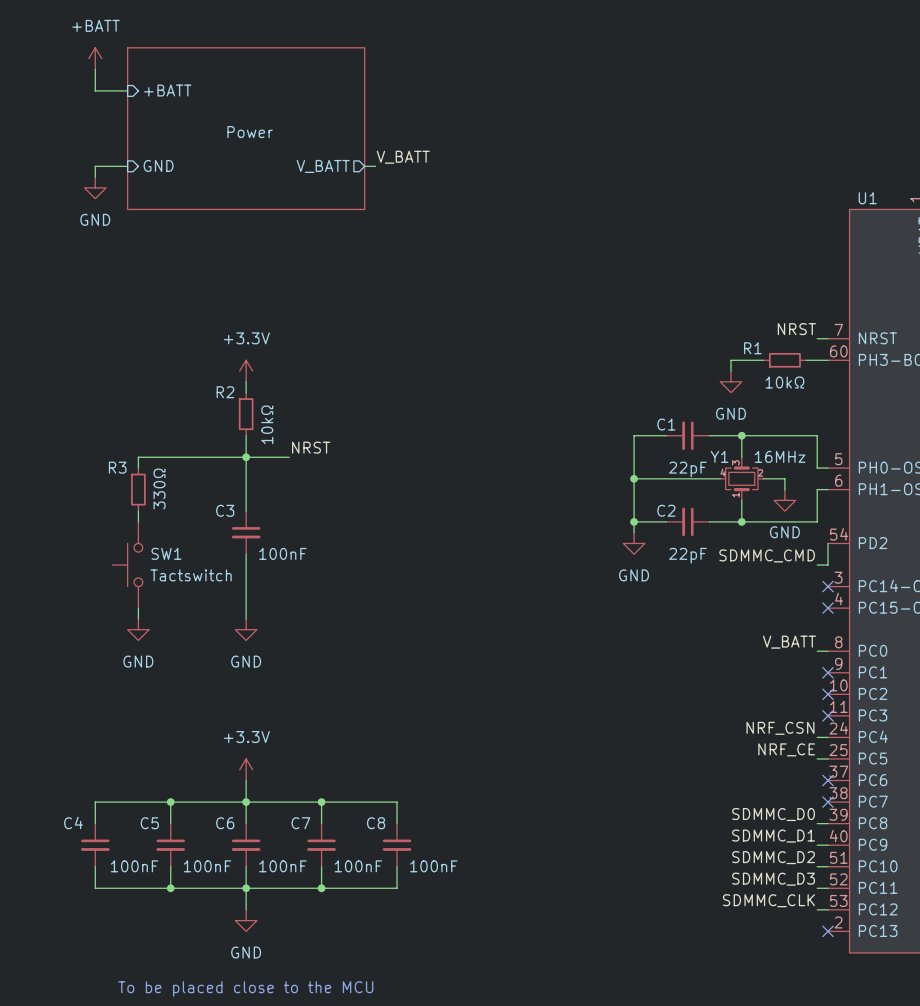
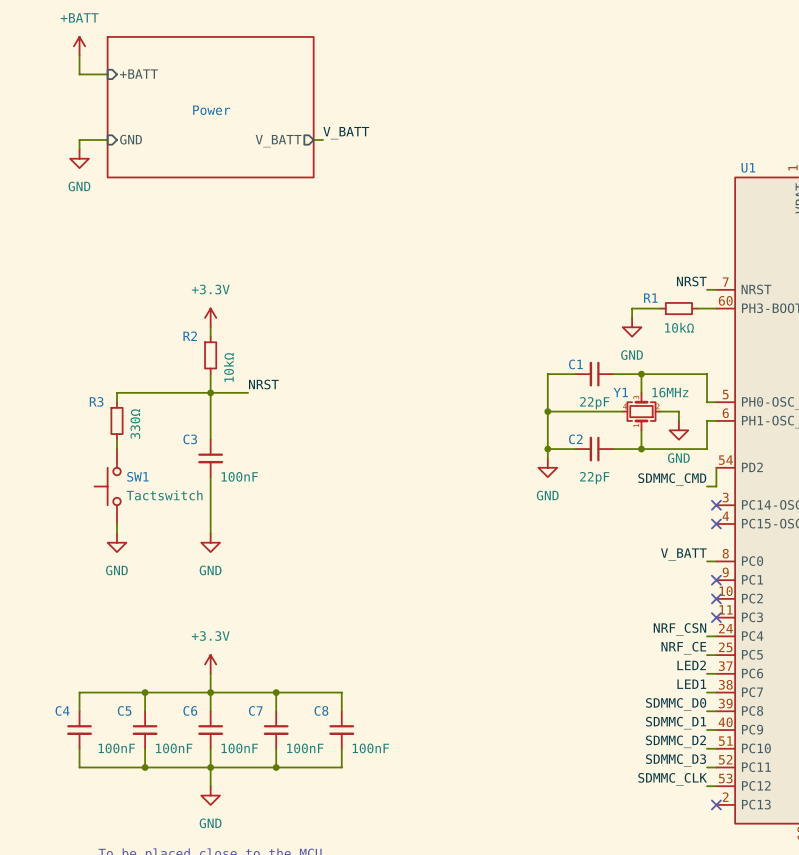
label: none -> LED2 (691, 665)
wire: none -> (707, 673) (716, 673)
no-connect mark: (828, 780) -> none
label: none -> LED1 (691, 684)
wire: none -> (707, 692) (716, 692)
no-connect mark: (828, 802) -> none

